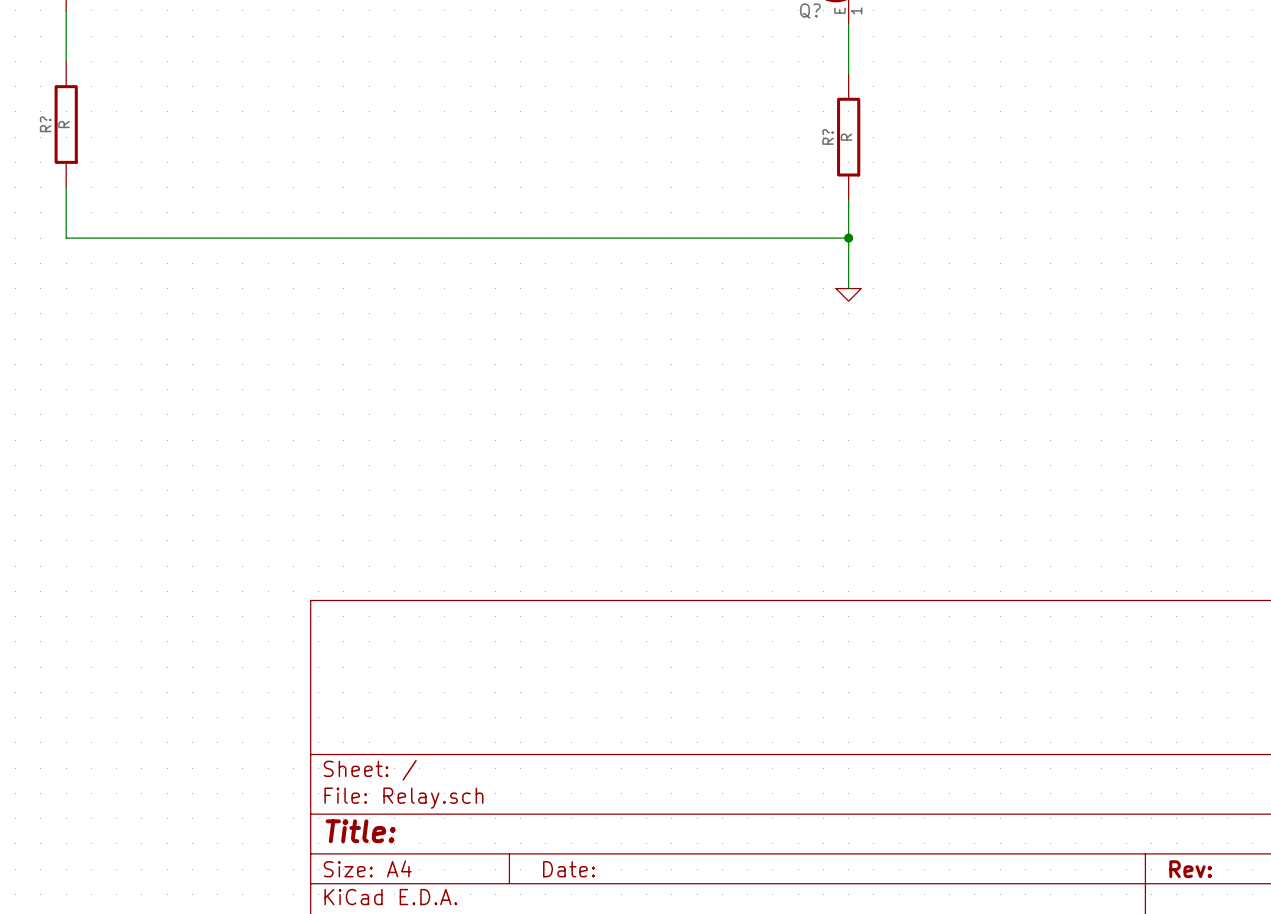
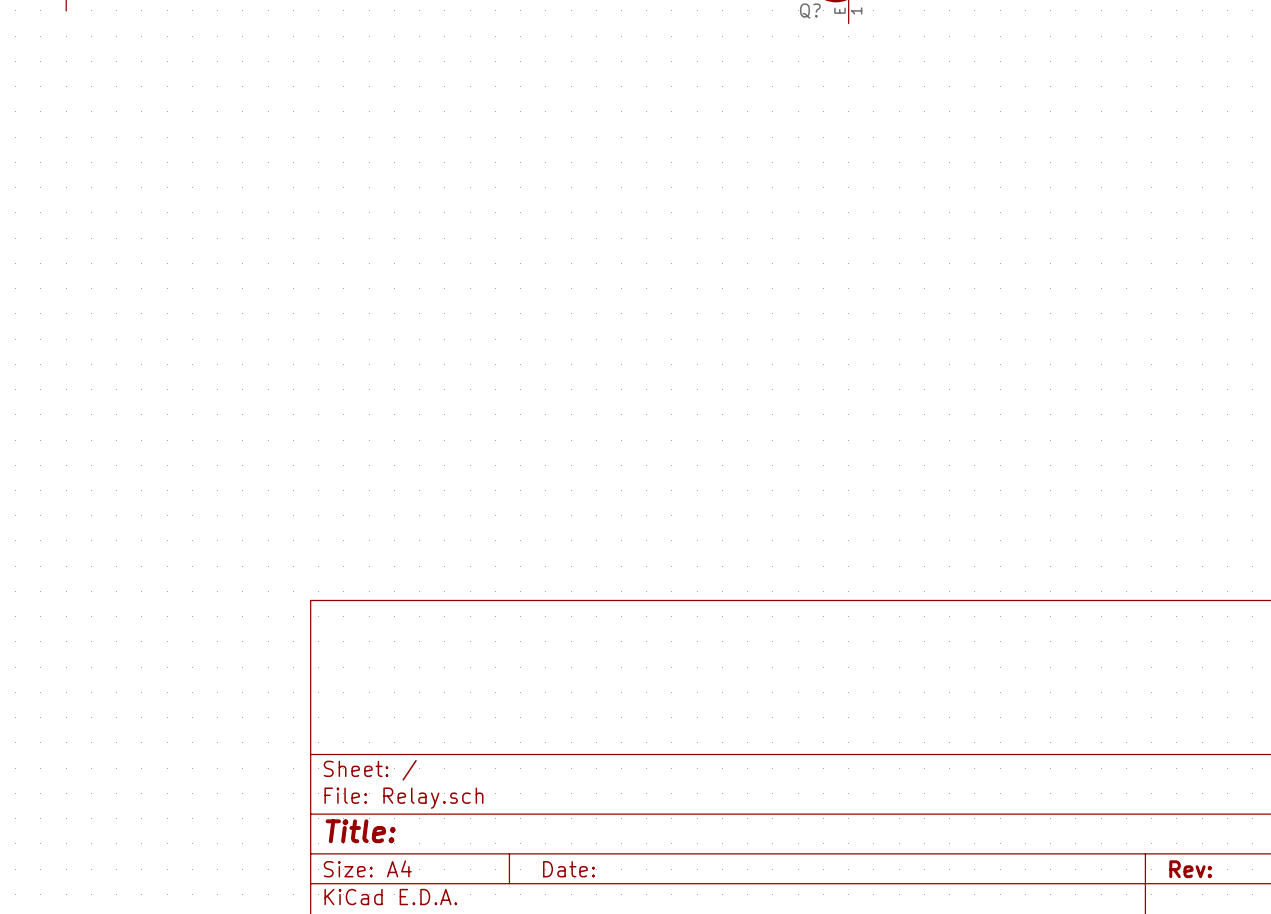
wire: (66, 10) (66, 61) -> none
wire: (848, 23) (848, 74) -> none
R?: R (66, 124) -> none
R?: R (848, 137) -> none
wire: (66, 187) (66, 238) (848, 238) -> none
wire: (848, 200) (848, 288) -> none
junction: (848, 238) -> none
power symbol: (848, 294) -> none

